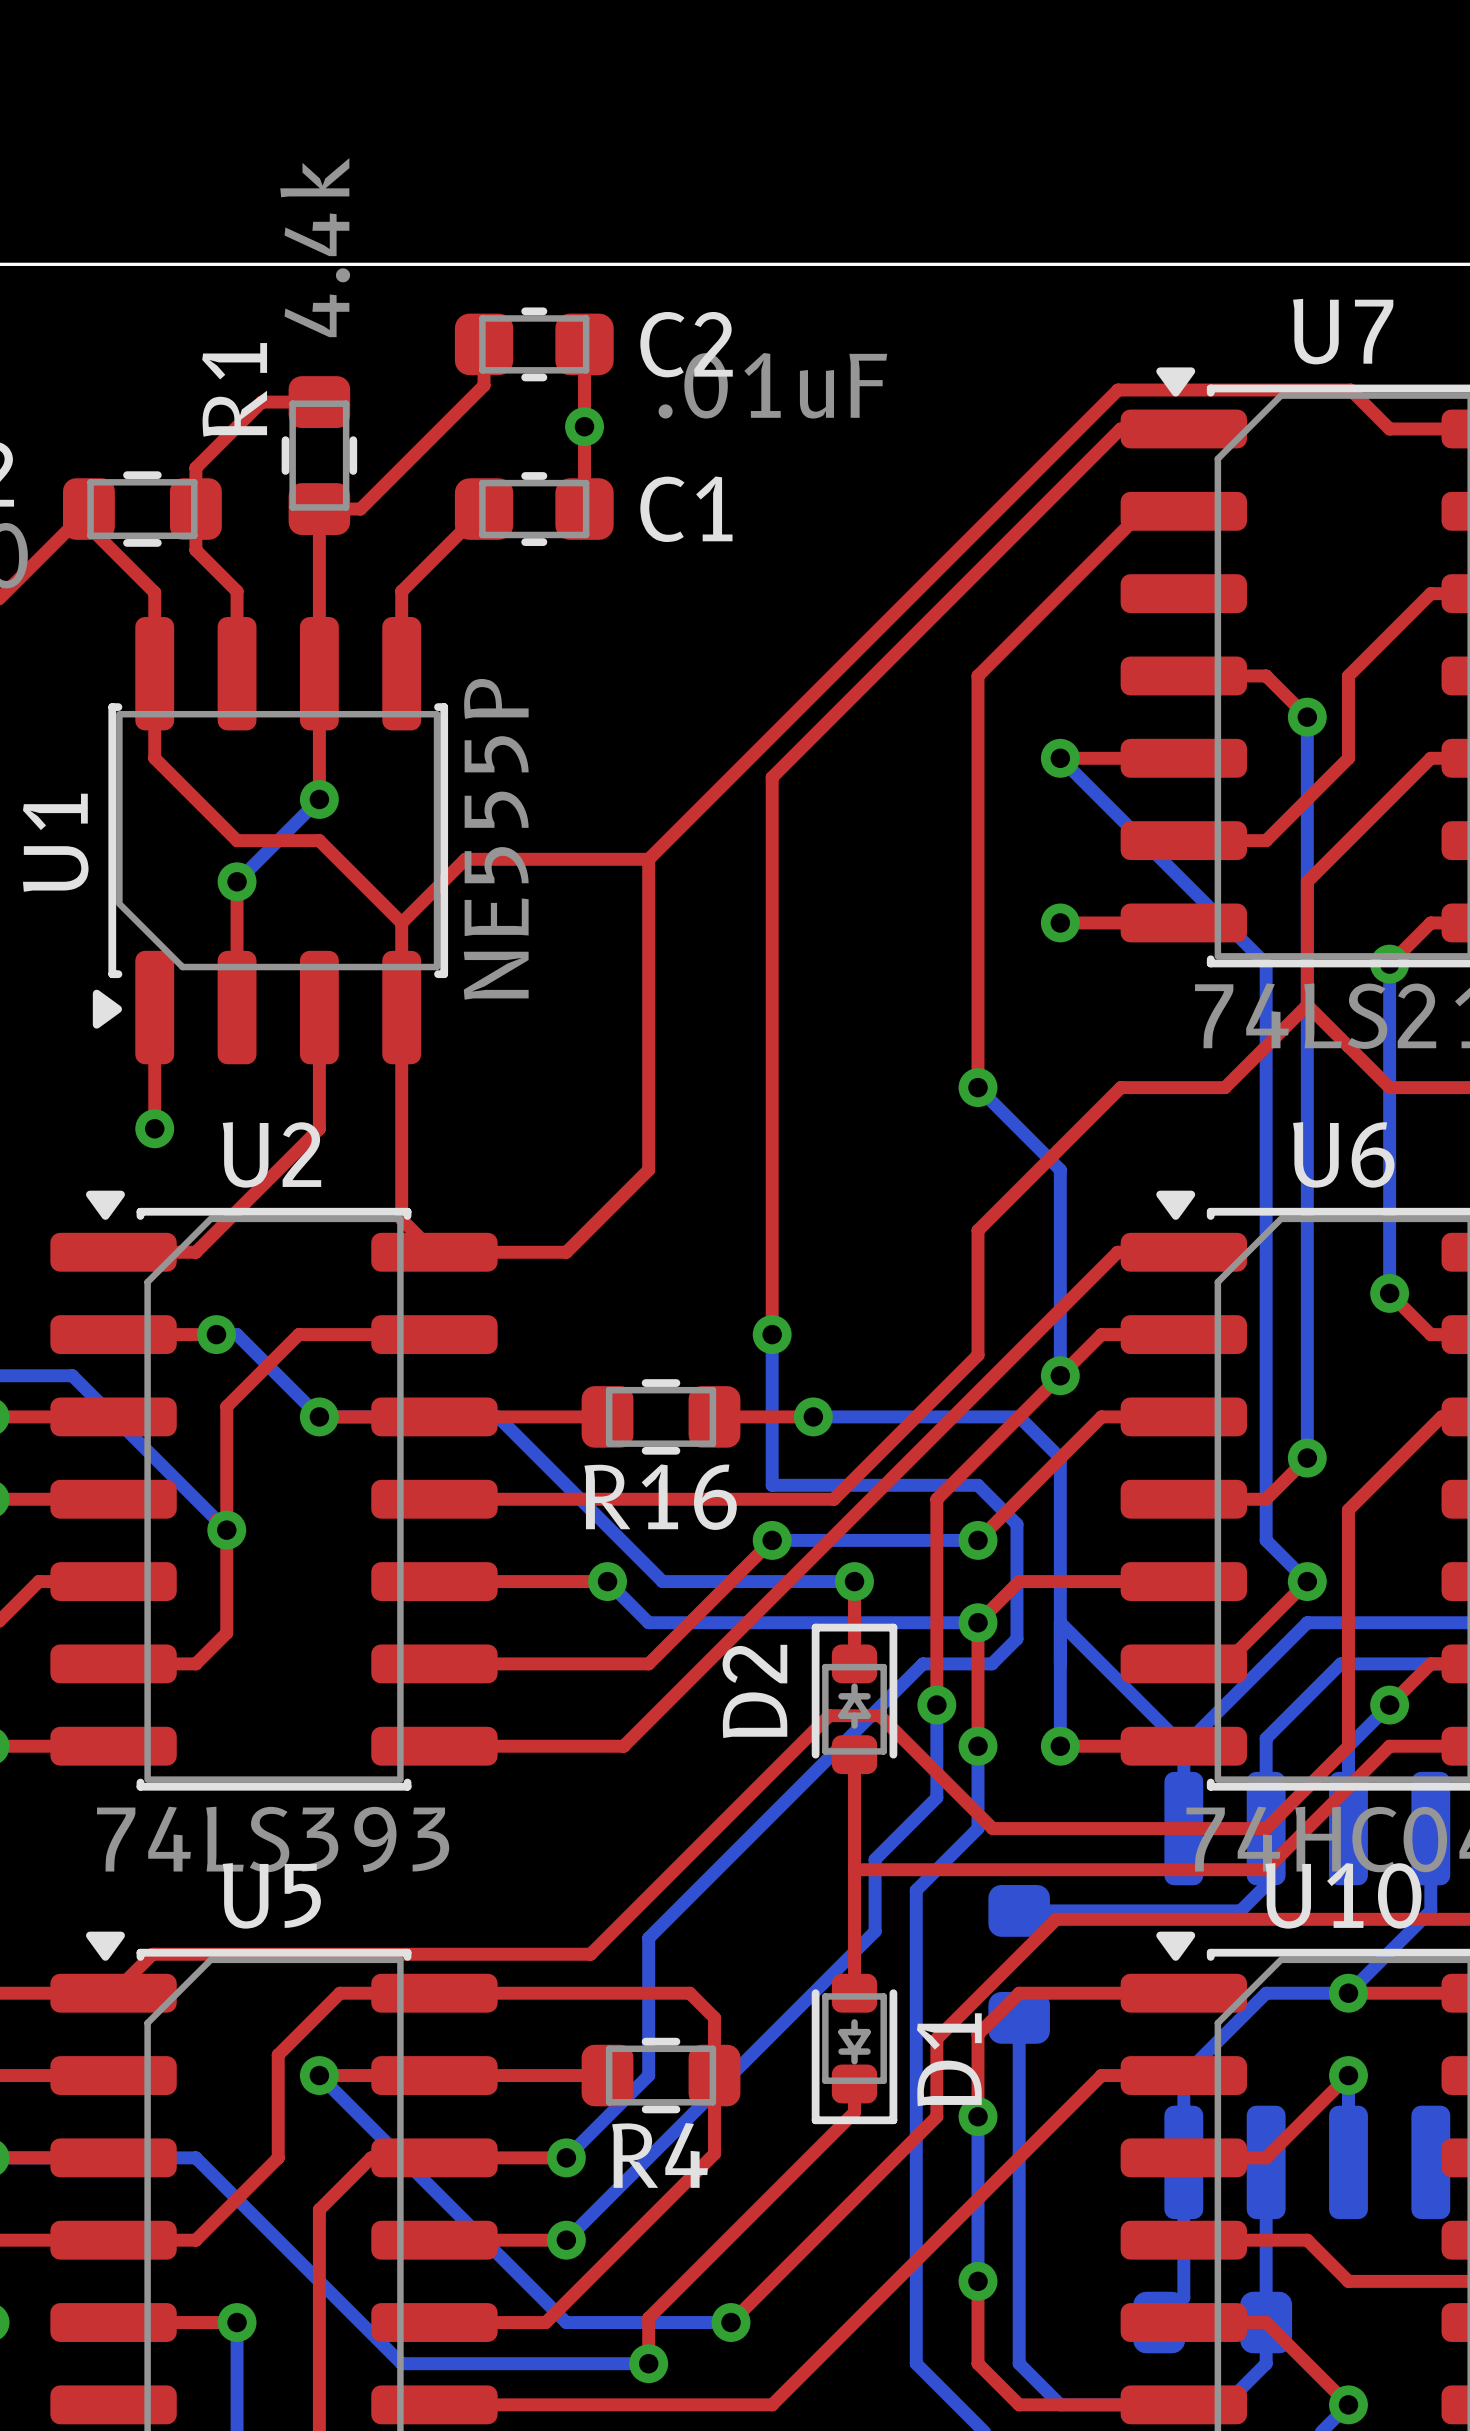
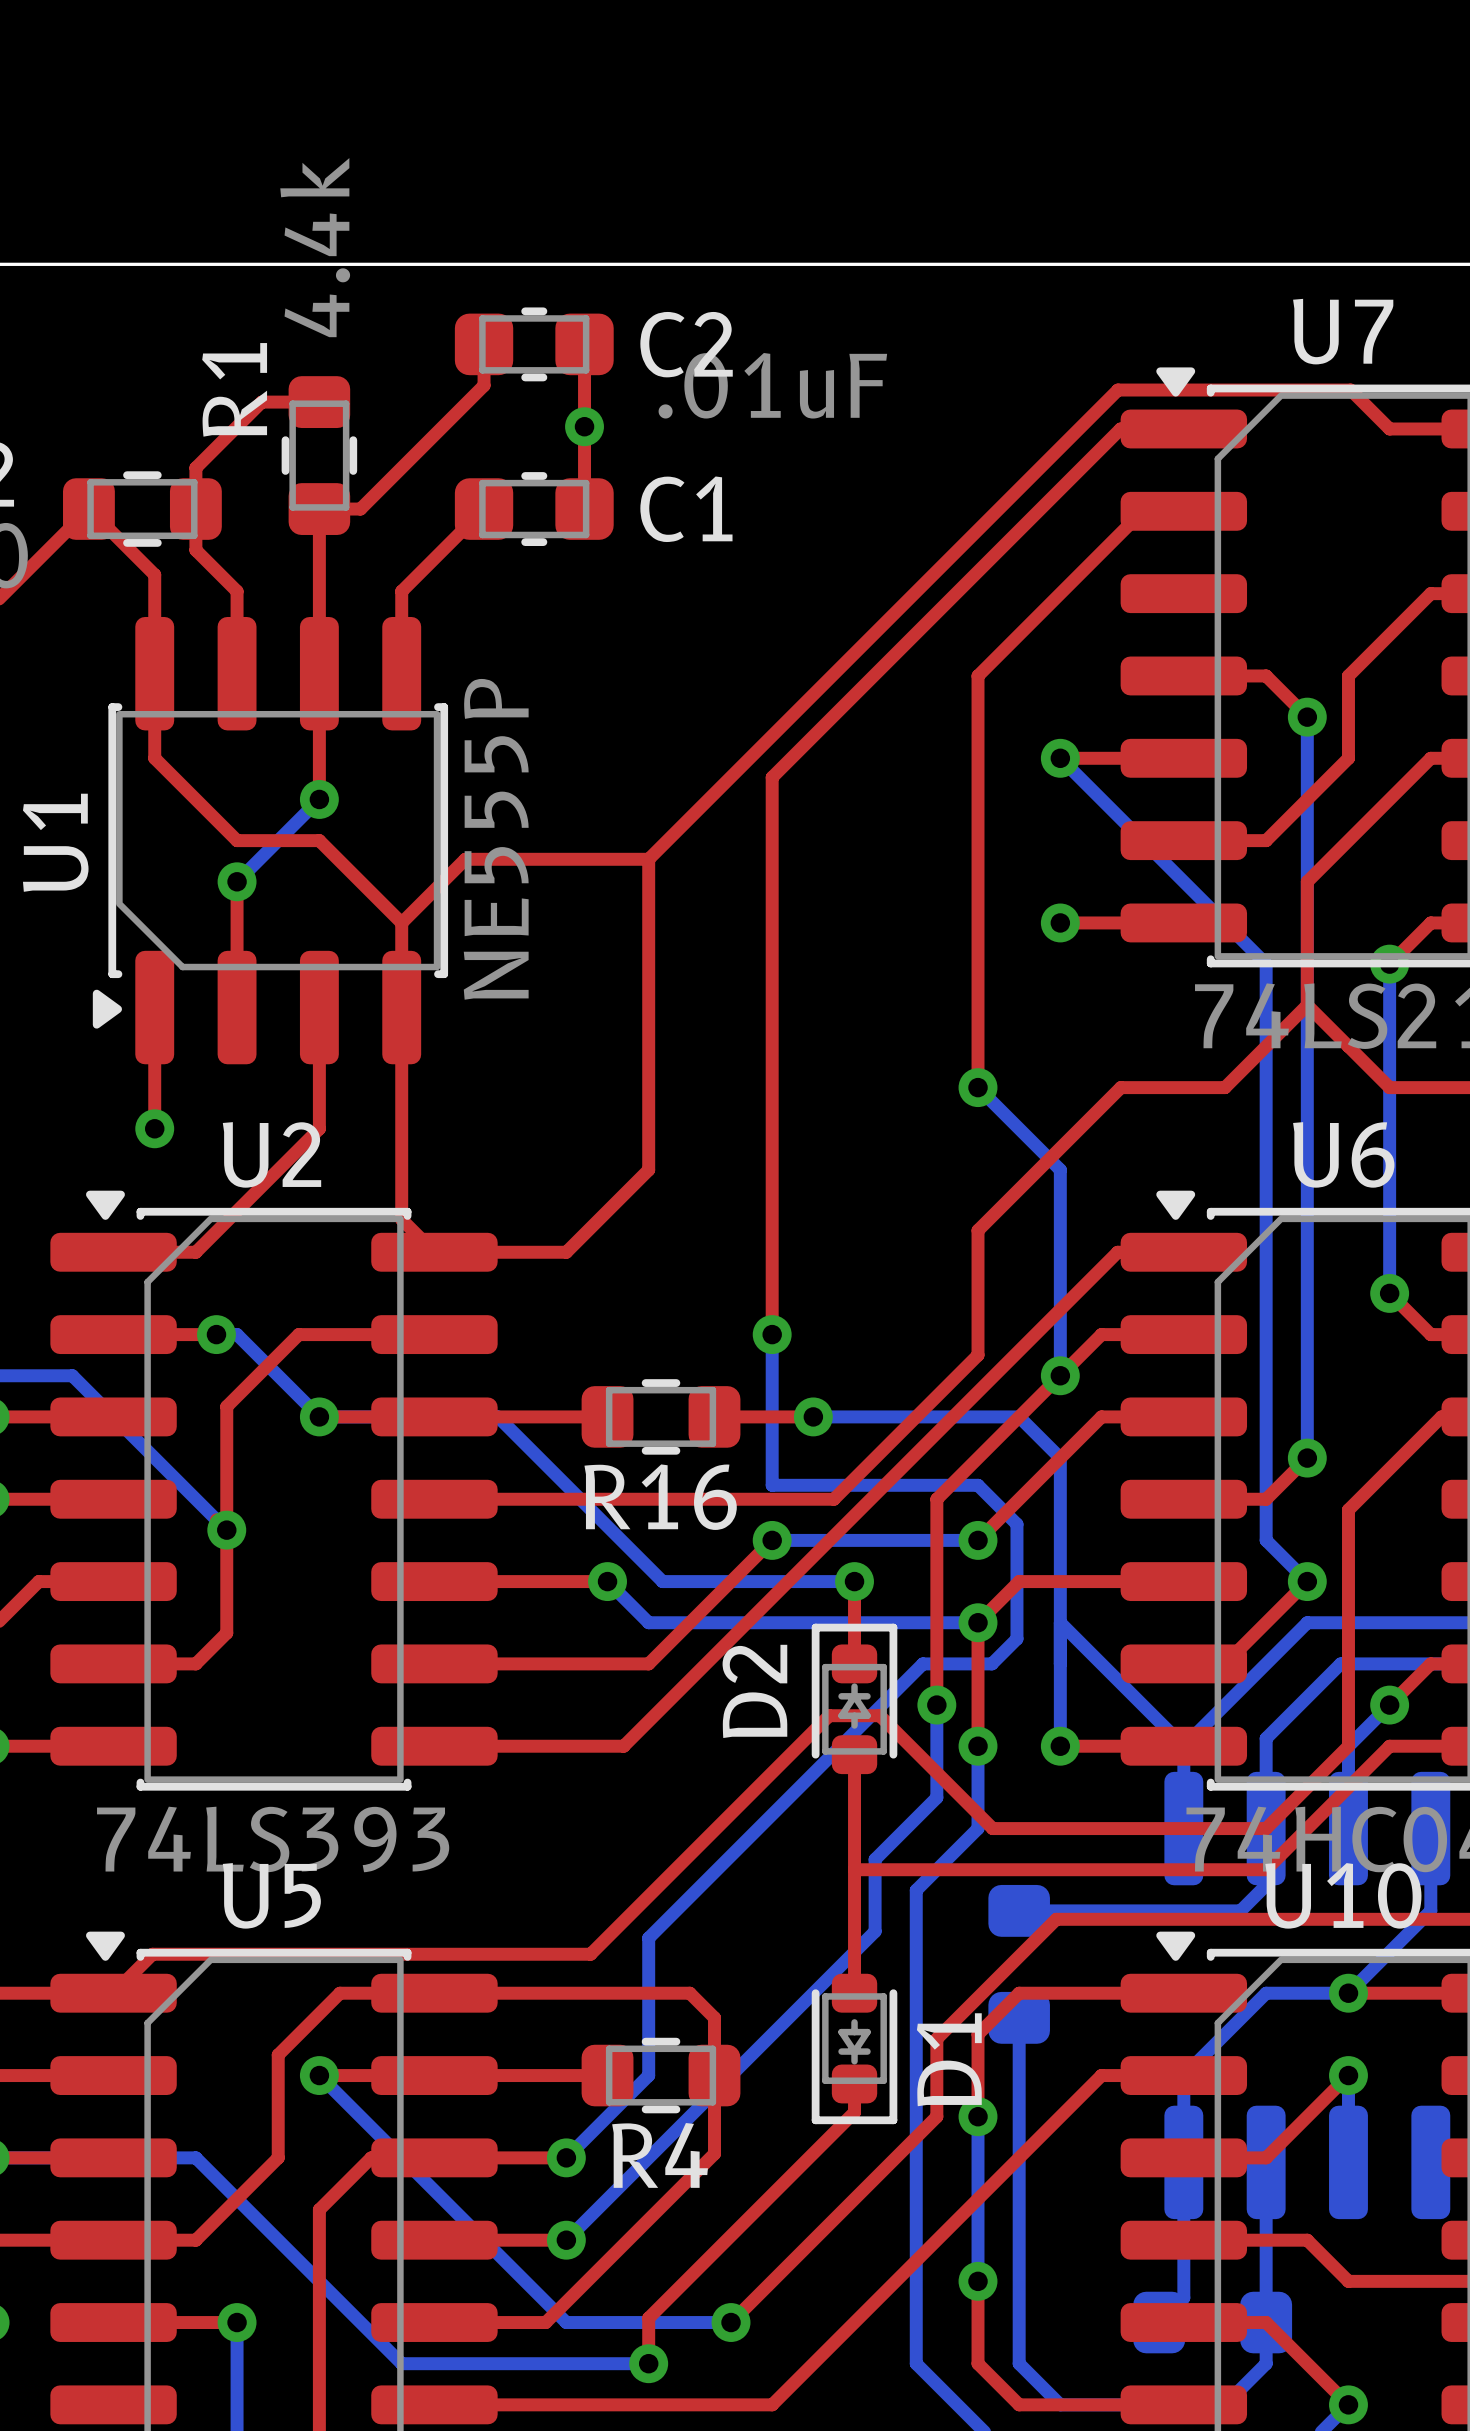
top track: (88, 509) (88, 526) (154, 592) -> (88, 509) (154, 574) (154, 592)

